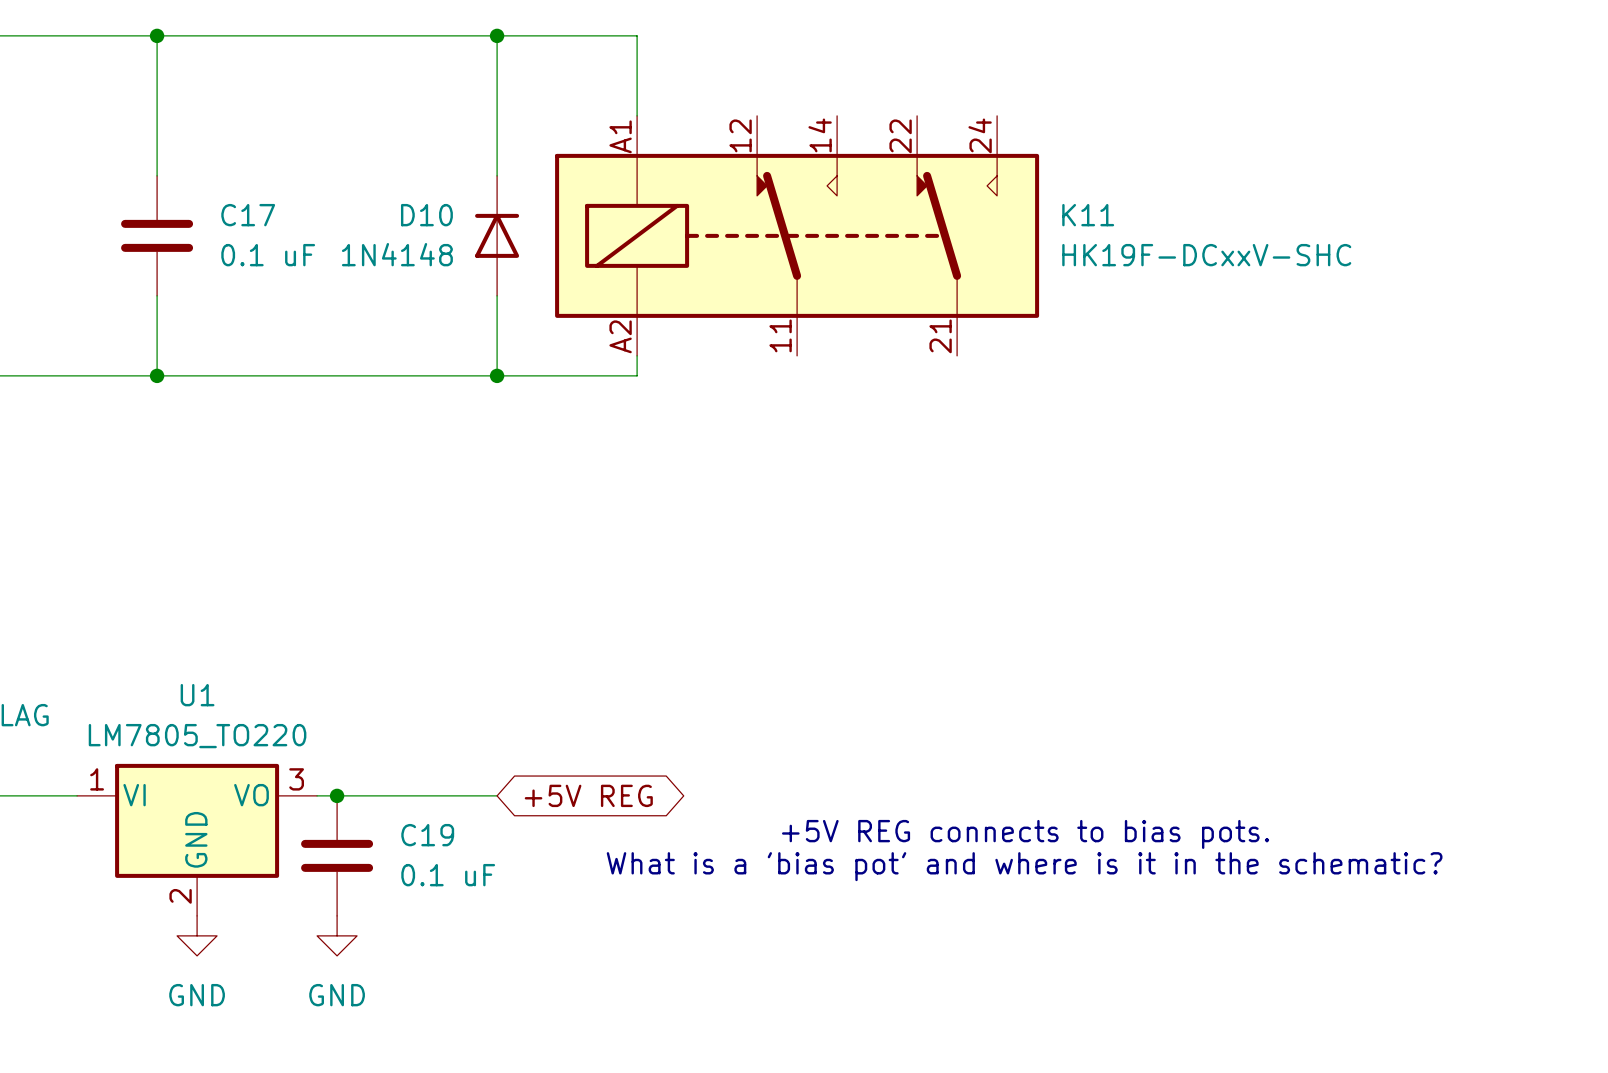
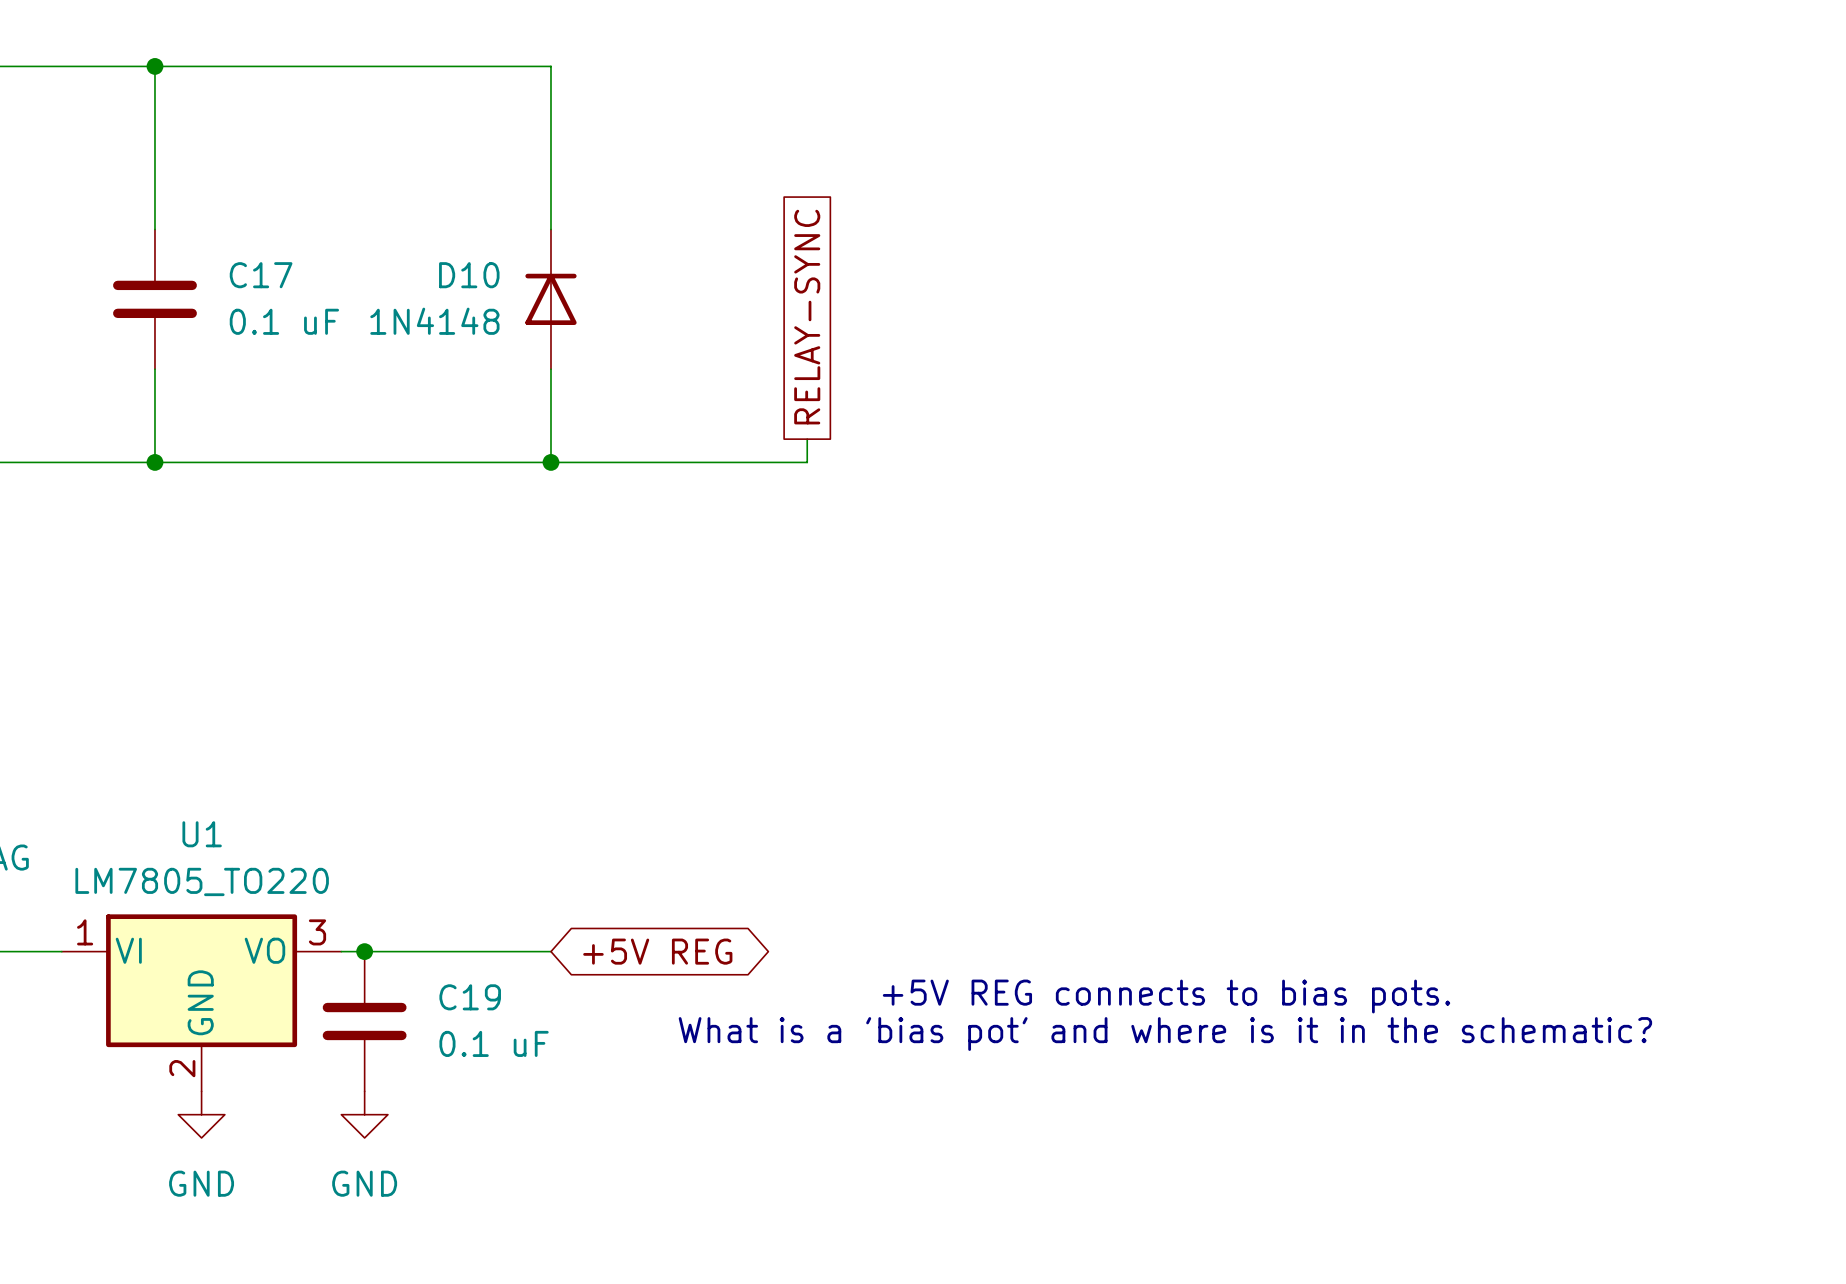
wire: (497, 35) (637, 35) (637, 115) -> none
junction: (497, 35) -> none
K11: HK19F-DCxxV-SHC (797, 235) -> none
global label: none -> RELAY-SYNC (807, 317)
wire: (637, 355) (637, 375) -> (807, 439) (807, 462) (714, 462)

